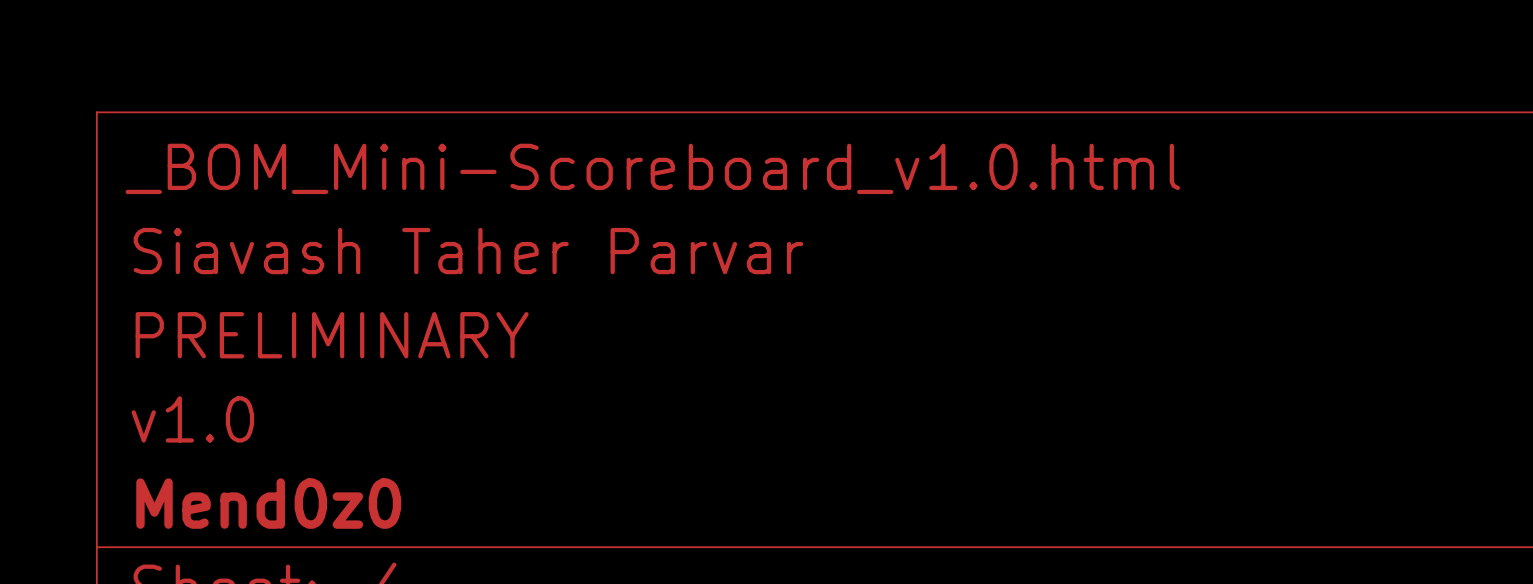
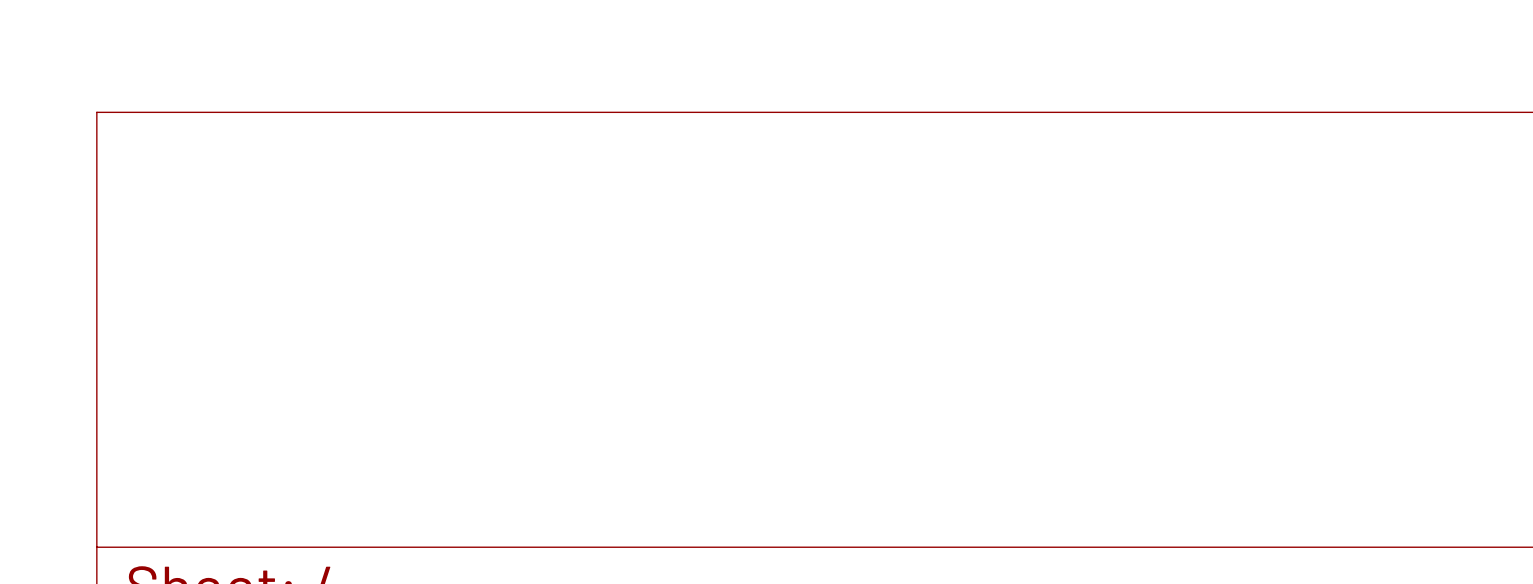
title block: _BOM_Mini-Scoreboard_v1.0.html (652, 168) -> none
title block: Siavash Taher Parvar (468, 251) -> none
title block: PRELIMINARY (332, 335) -> none
title block: v1.0 (192, 419) -> none
title block: Mend0z0 (268, 503) -> none

